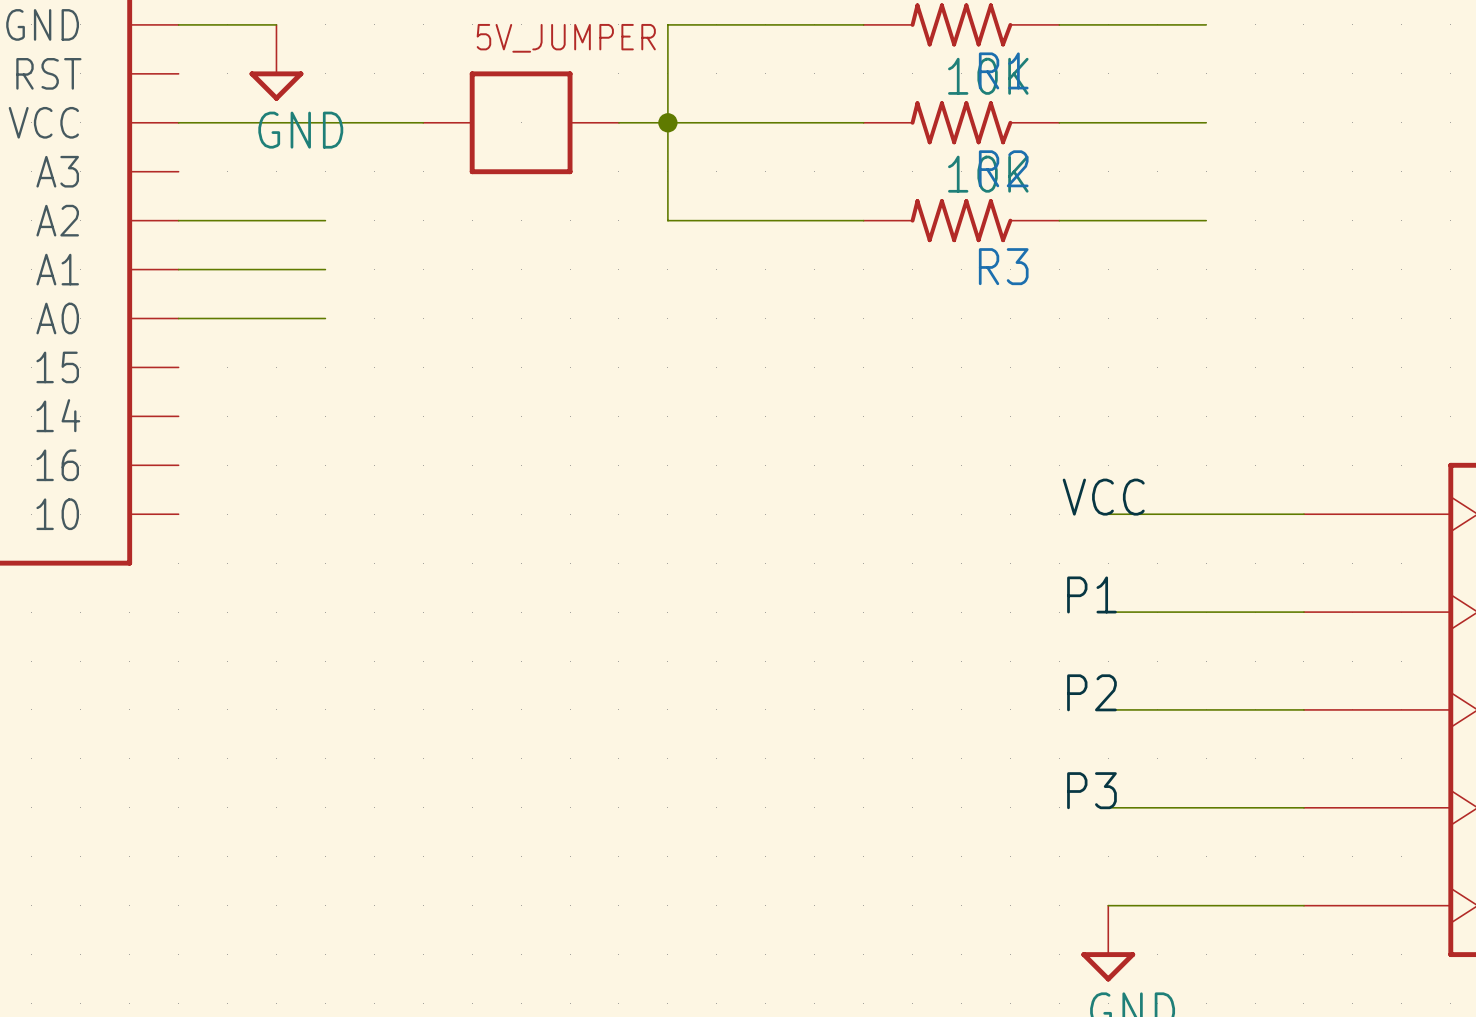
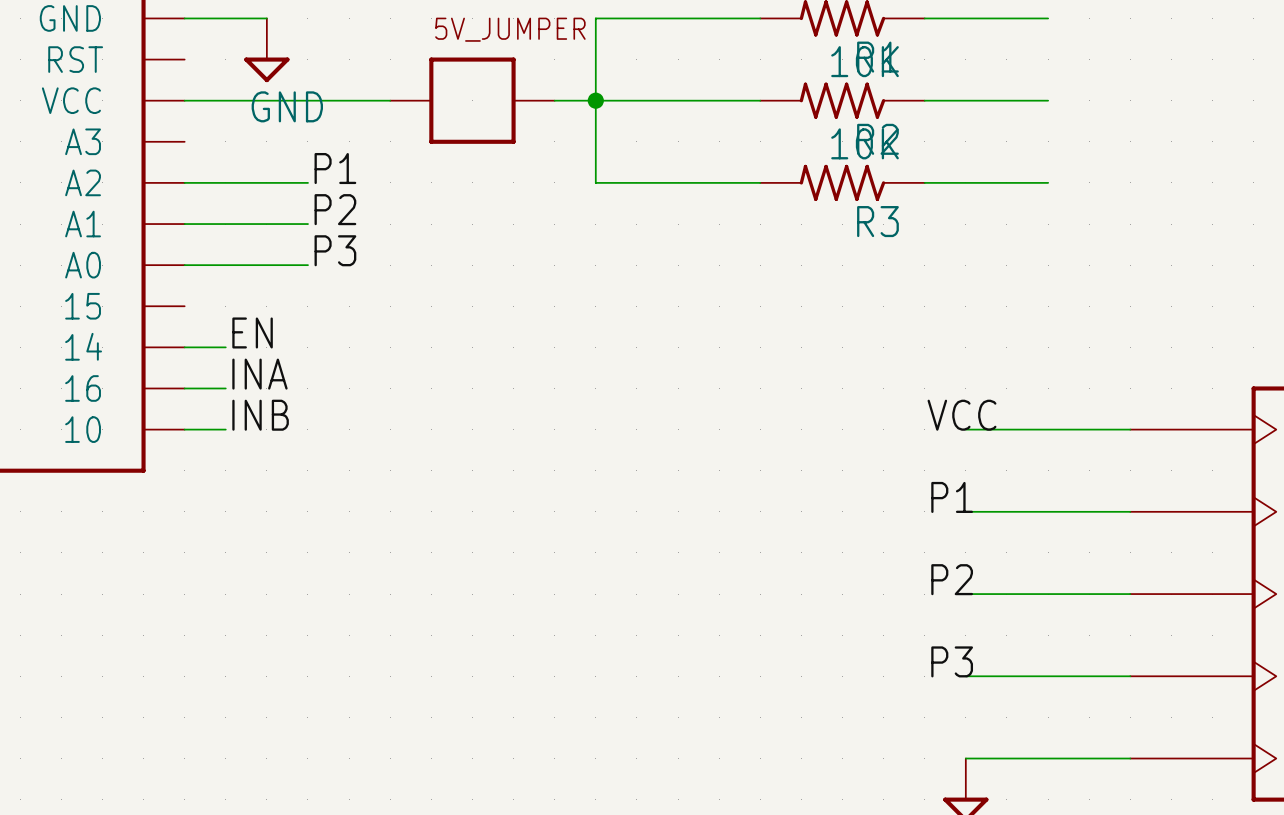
label: none -> P1 (335, 168)
label: none -> P2 (335, 209)
label: none -> P3 (335, 250)
label: none -> EN (252, 332)
wire: none -> (184, 347) (225, 347)
label: none -> INA (259, 374)
wire: none -> (184, 388) (225, 388)
label: none -> INB (260, 415)
wire: none -> (184, 429) (225, 429)

